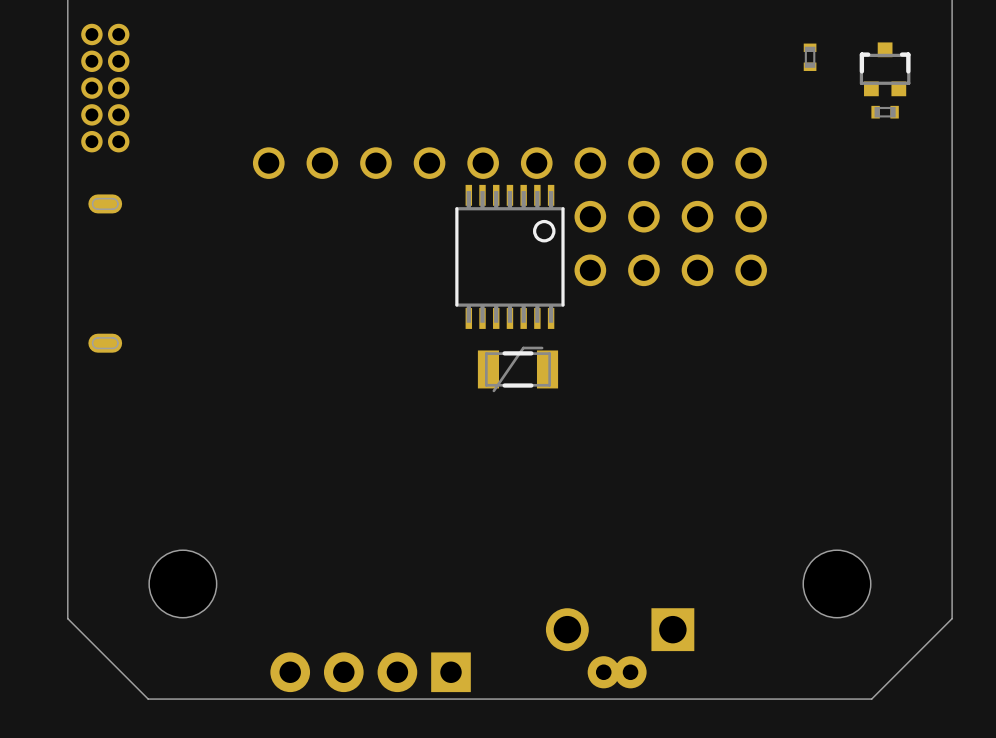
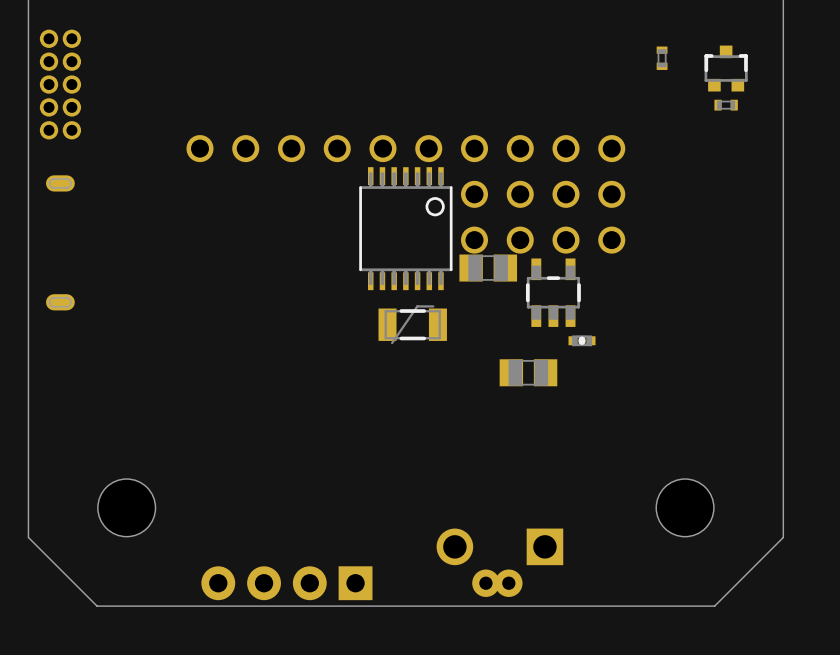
part: none -> (488, 268)
part: none -> (553, 292)
part: none -> (582, 340)
part: none -> (528, 372)

